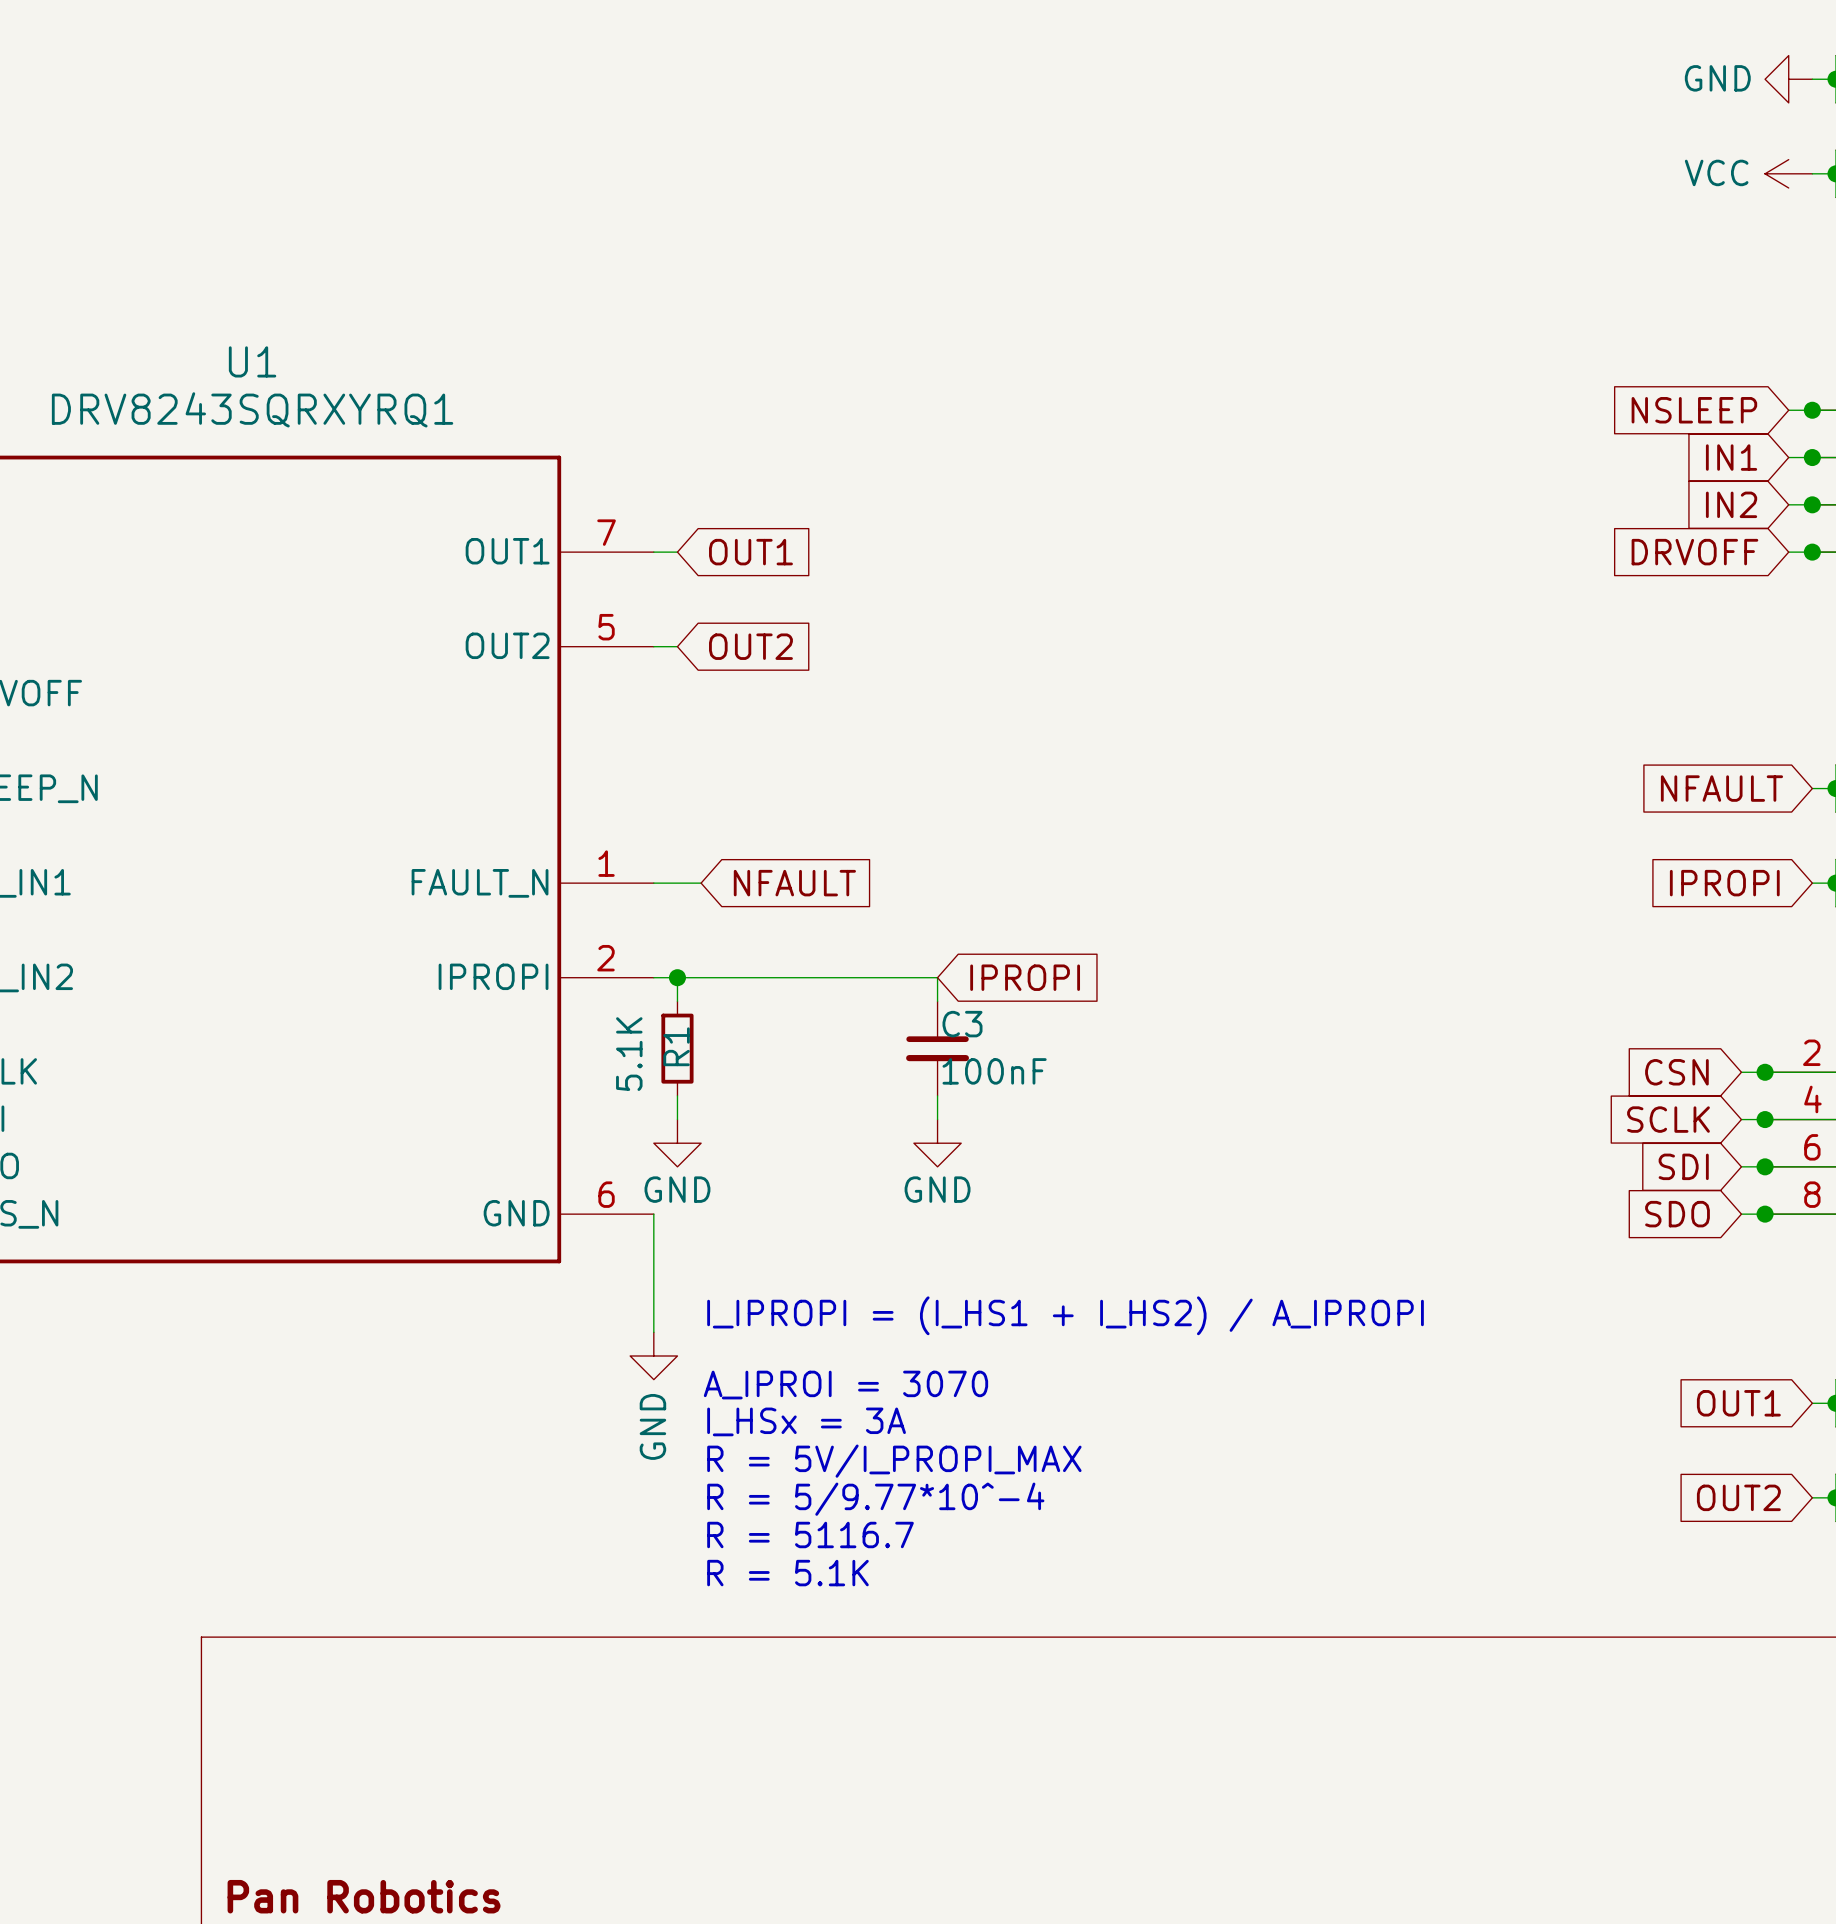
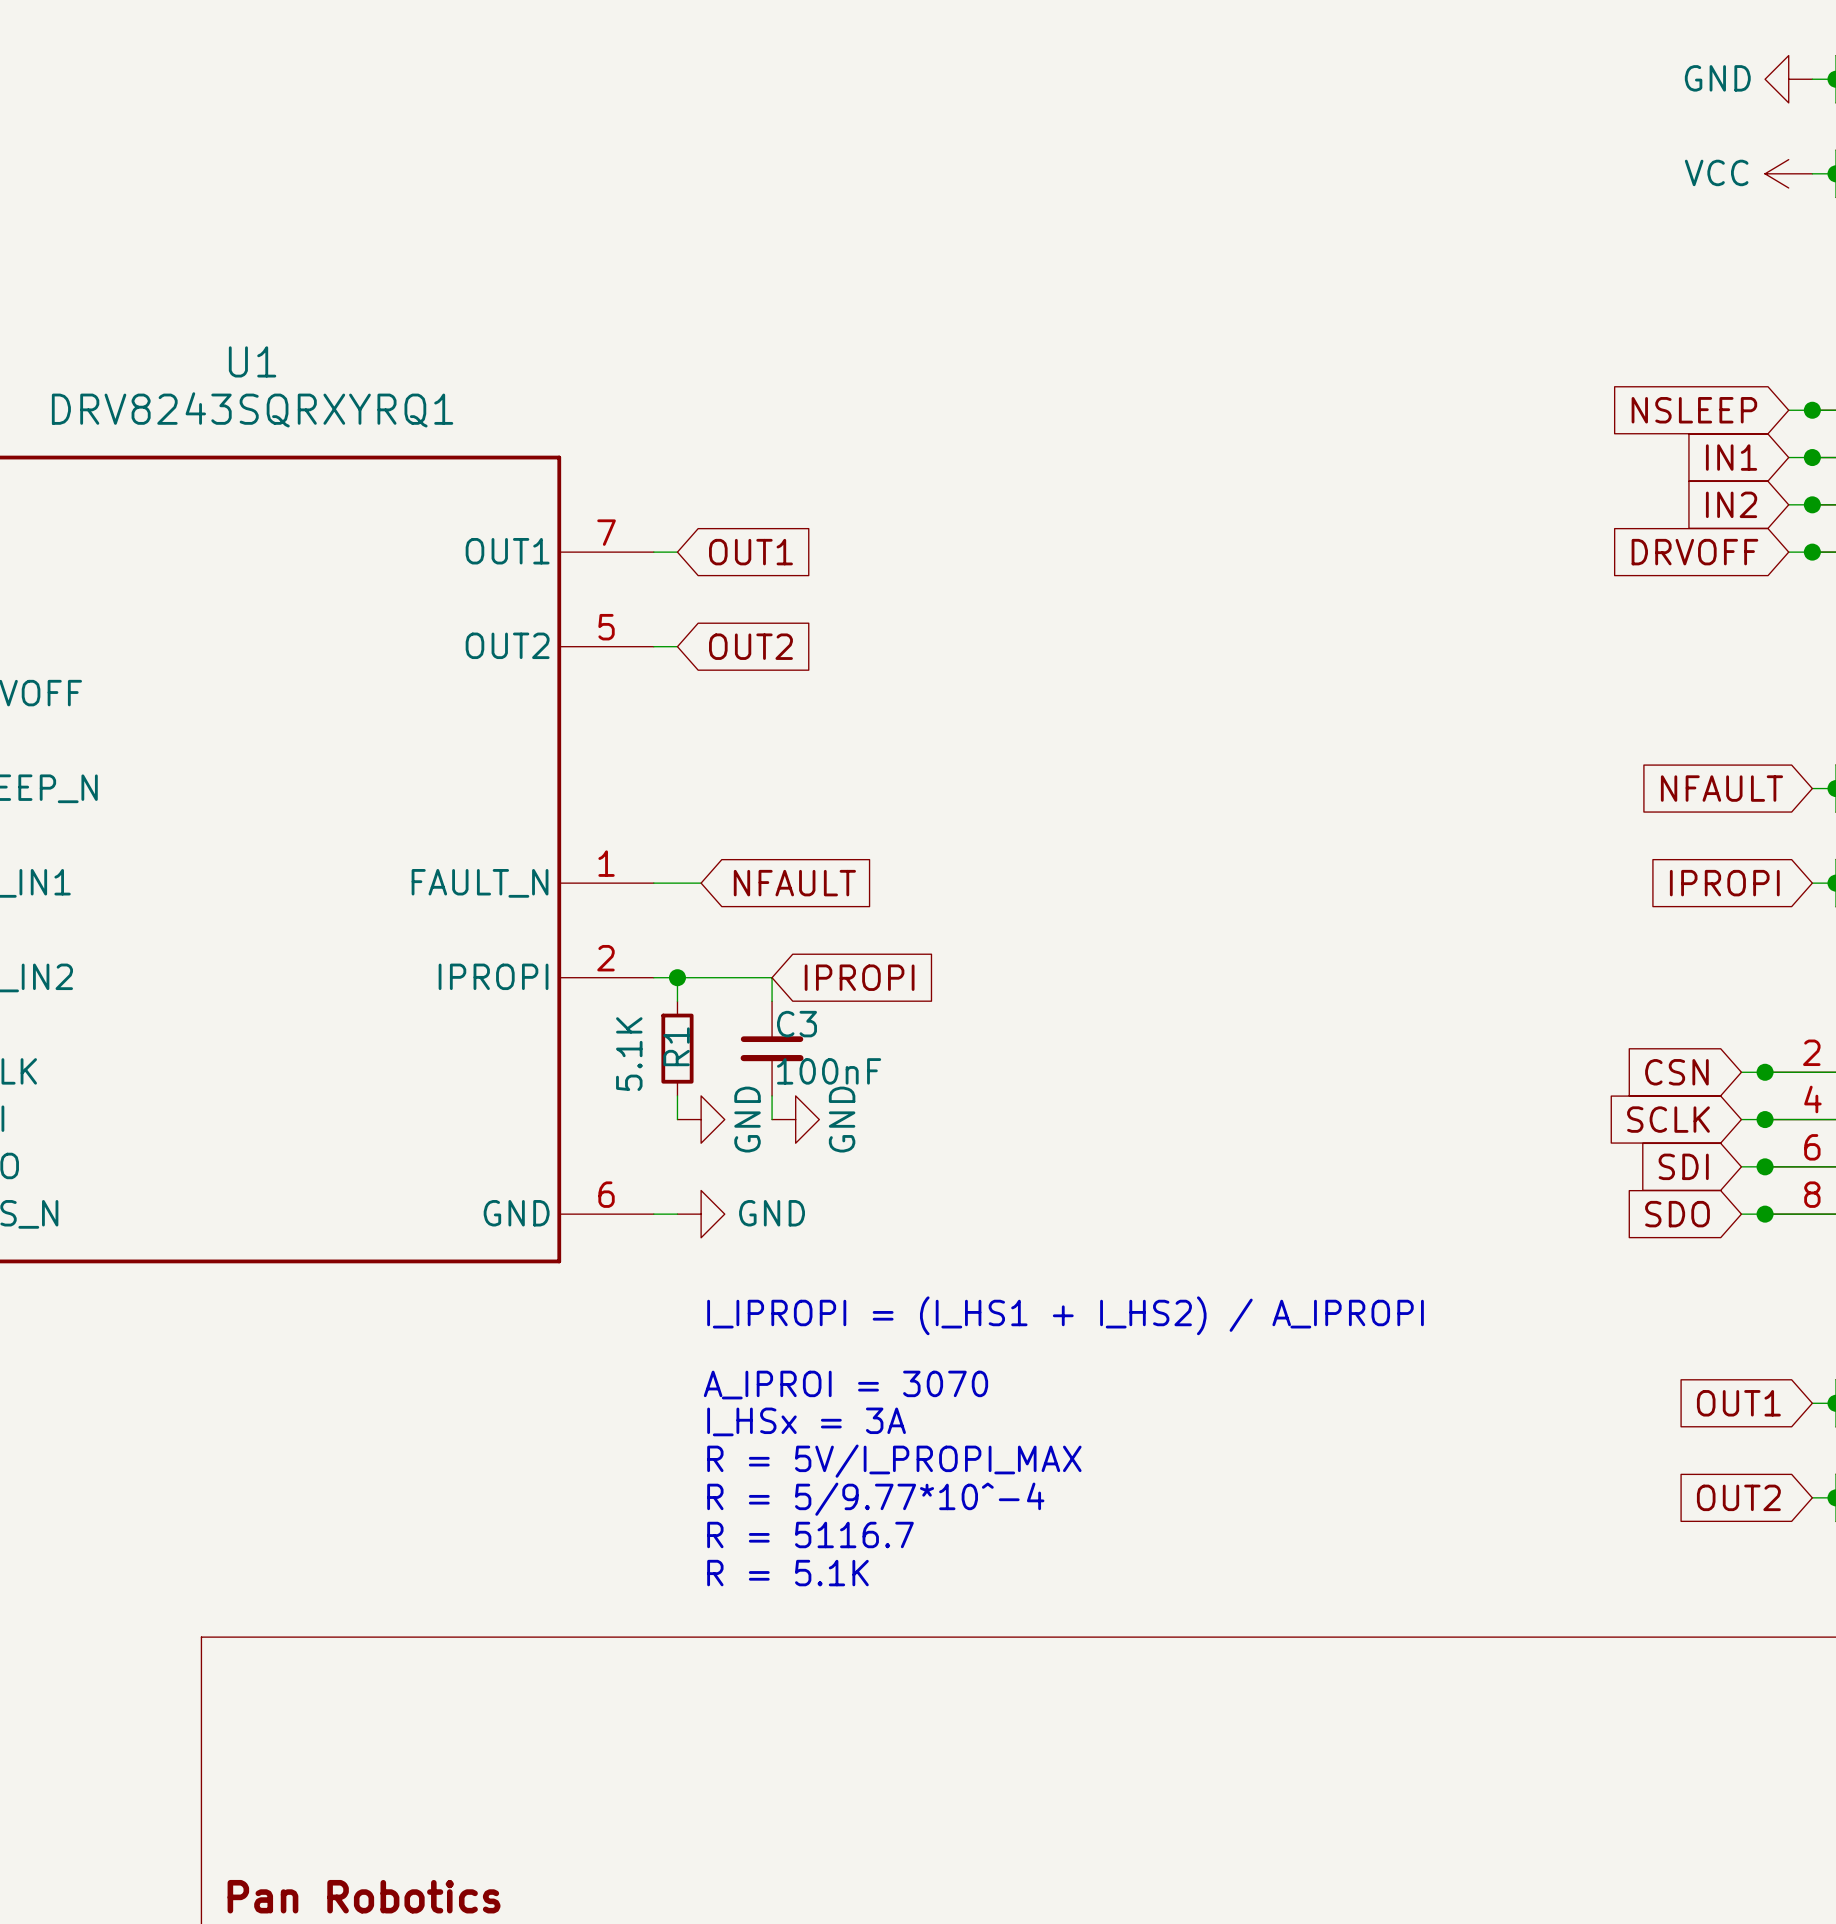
wire: (772, 977) (937, 977) (937, 1001) -> (772, 977) (772, 1001)
global label position: IPROPI (1025, 977) -> IPROPI (859, 977)
C3 position: (937, 1048) -> (772, 1048)
wire: (937, 1095) (937, 1119) -> (772, 1095) (772, 1119)
power symbol: none -> GND (795, 1119)
power symbol rotation: 0° (677, 1143) -> 90° counterclockwise (701, 1119)
power symbol position: GND (677, 1143) -> GND (701, 1119)
power symbol: GND (937, 1143) -> none
wire: (653, 1214) (653, 1332) -> (653, 1214) (677, 1214)
power symbol: none -> GND (701, 1214)
power symbol: GND (653, 1356) -> none

